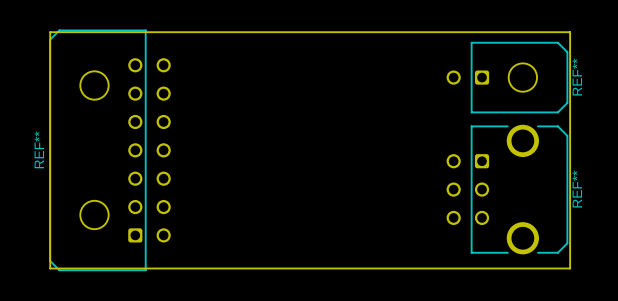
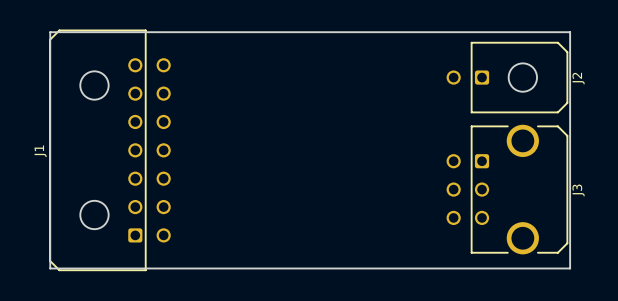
REF** name: REF** (577, 77) -> J2 (578, 78)
REF** name: REF** (39, 149) -> J1 (40, 151)
REF** name: REF** (577, 189) -> J3 (578, 190)

